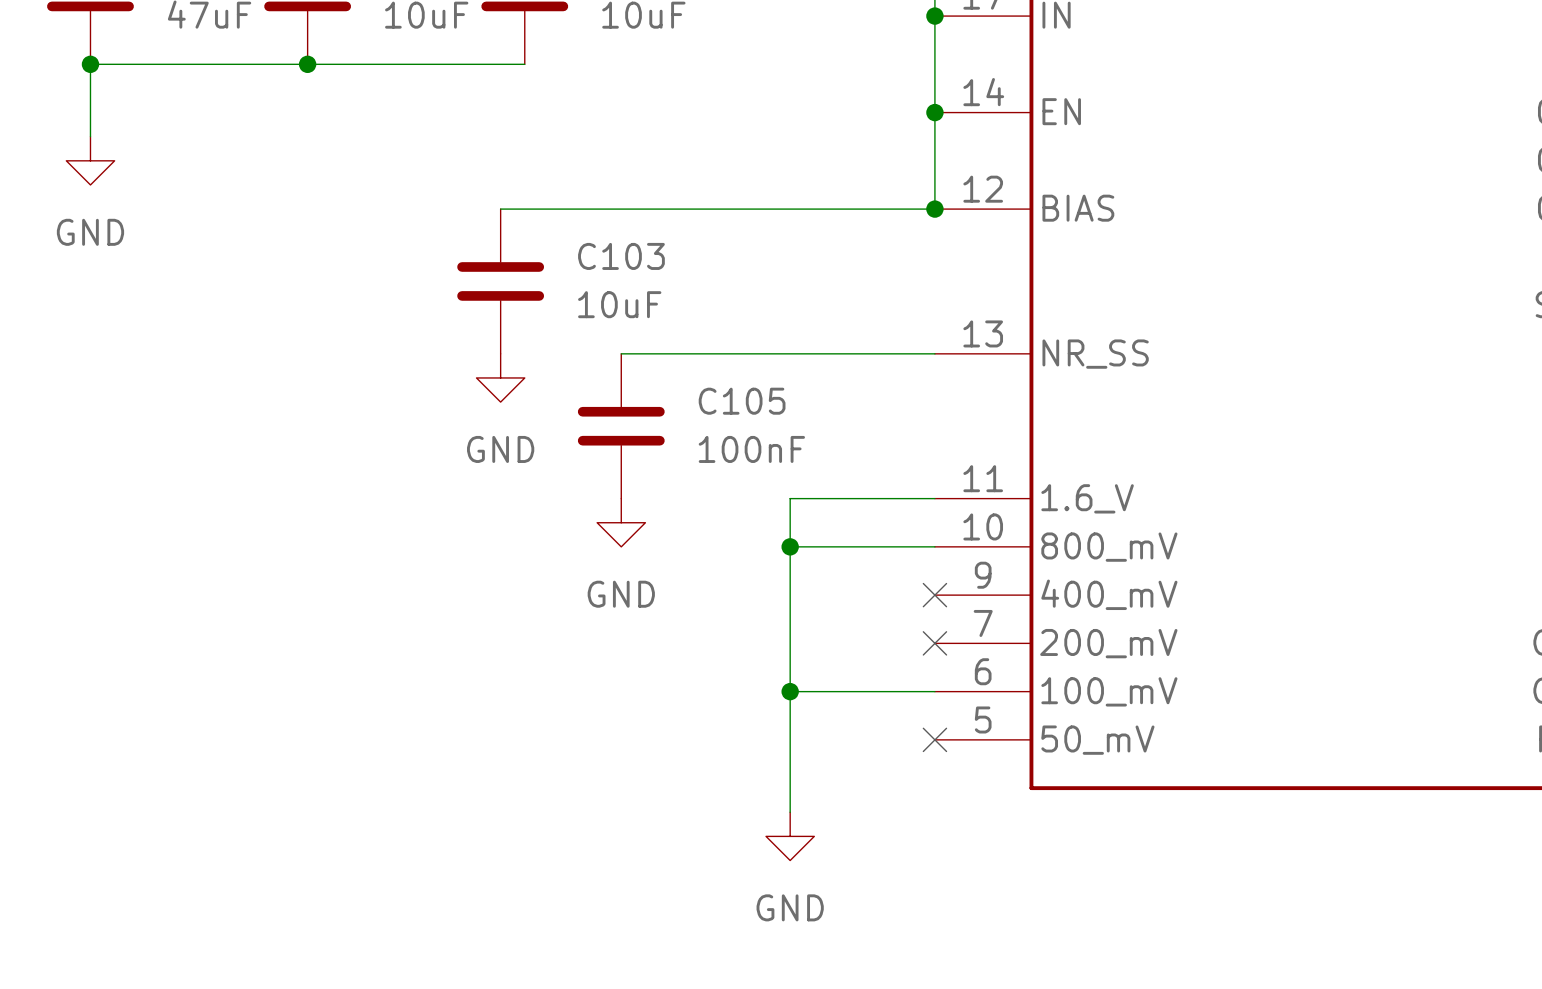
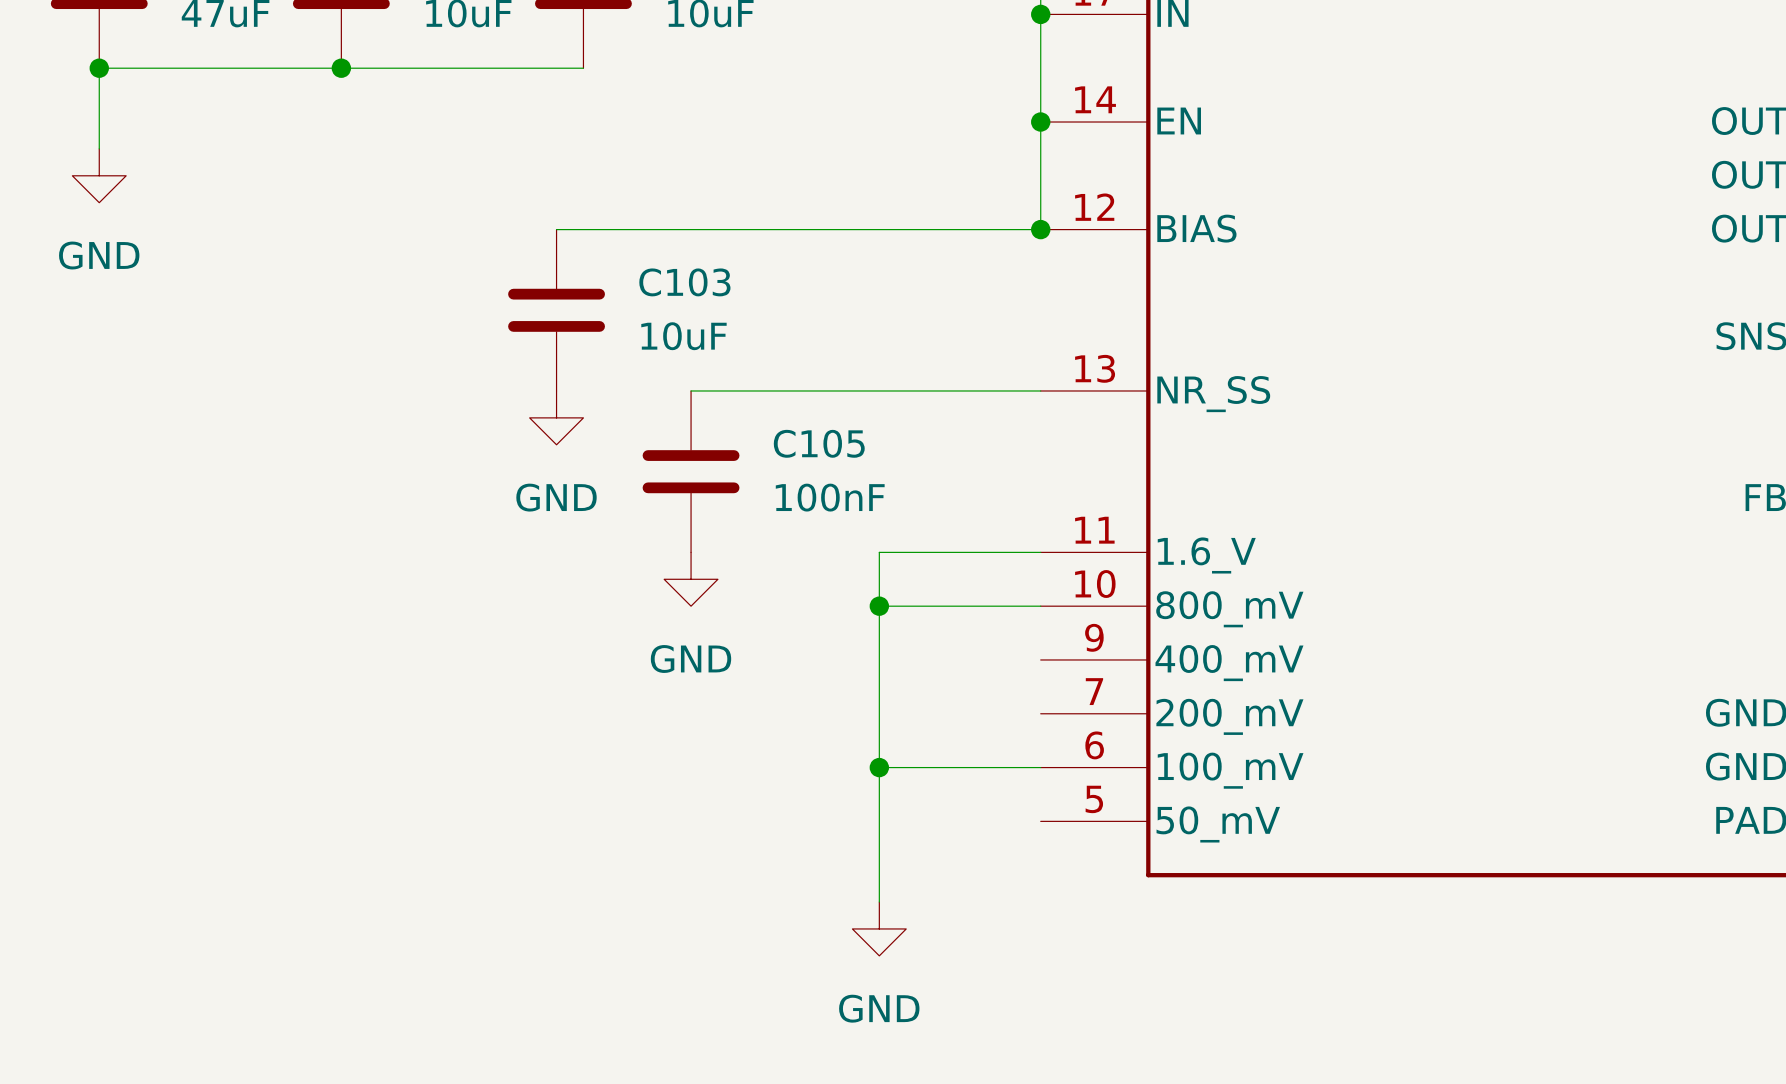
no-connect mark: (934, 595) -> none
no-connect mark: (934, 643) -> none
no-connect mark: (934, 739) -> none

